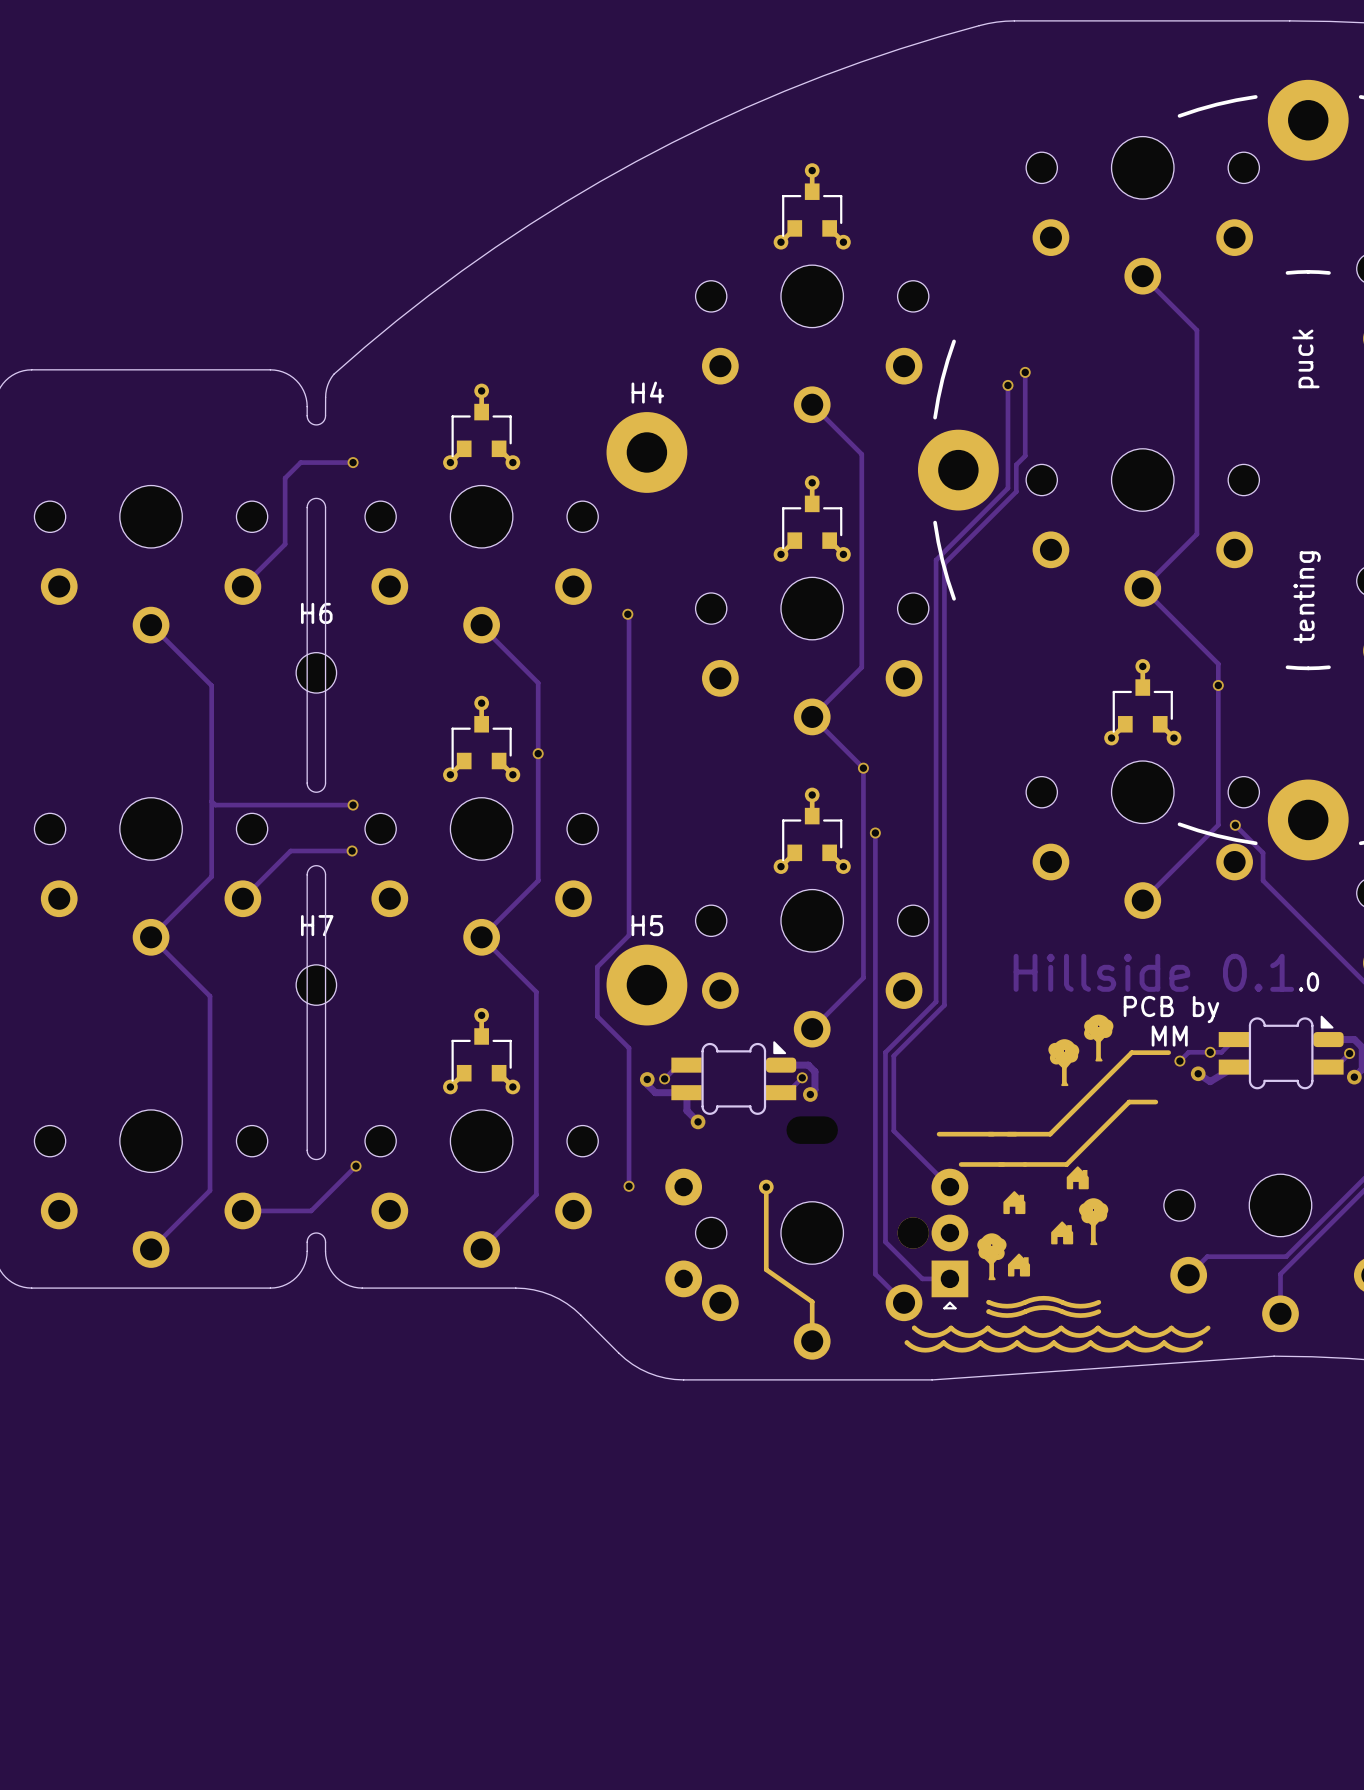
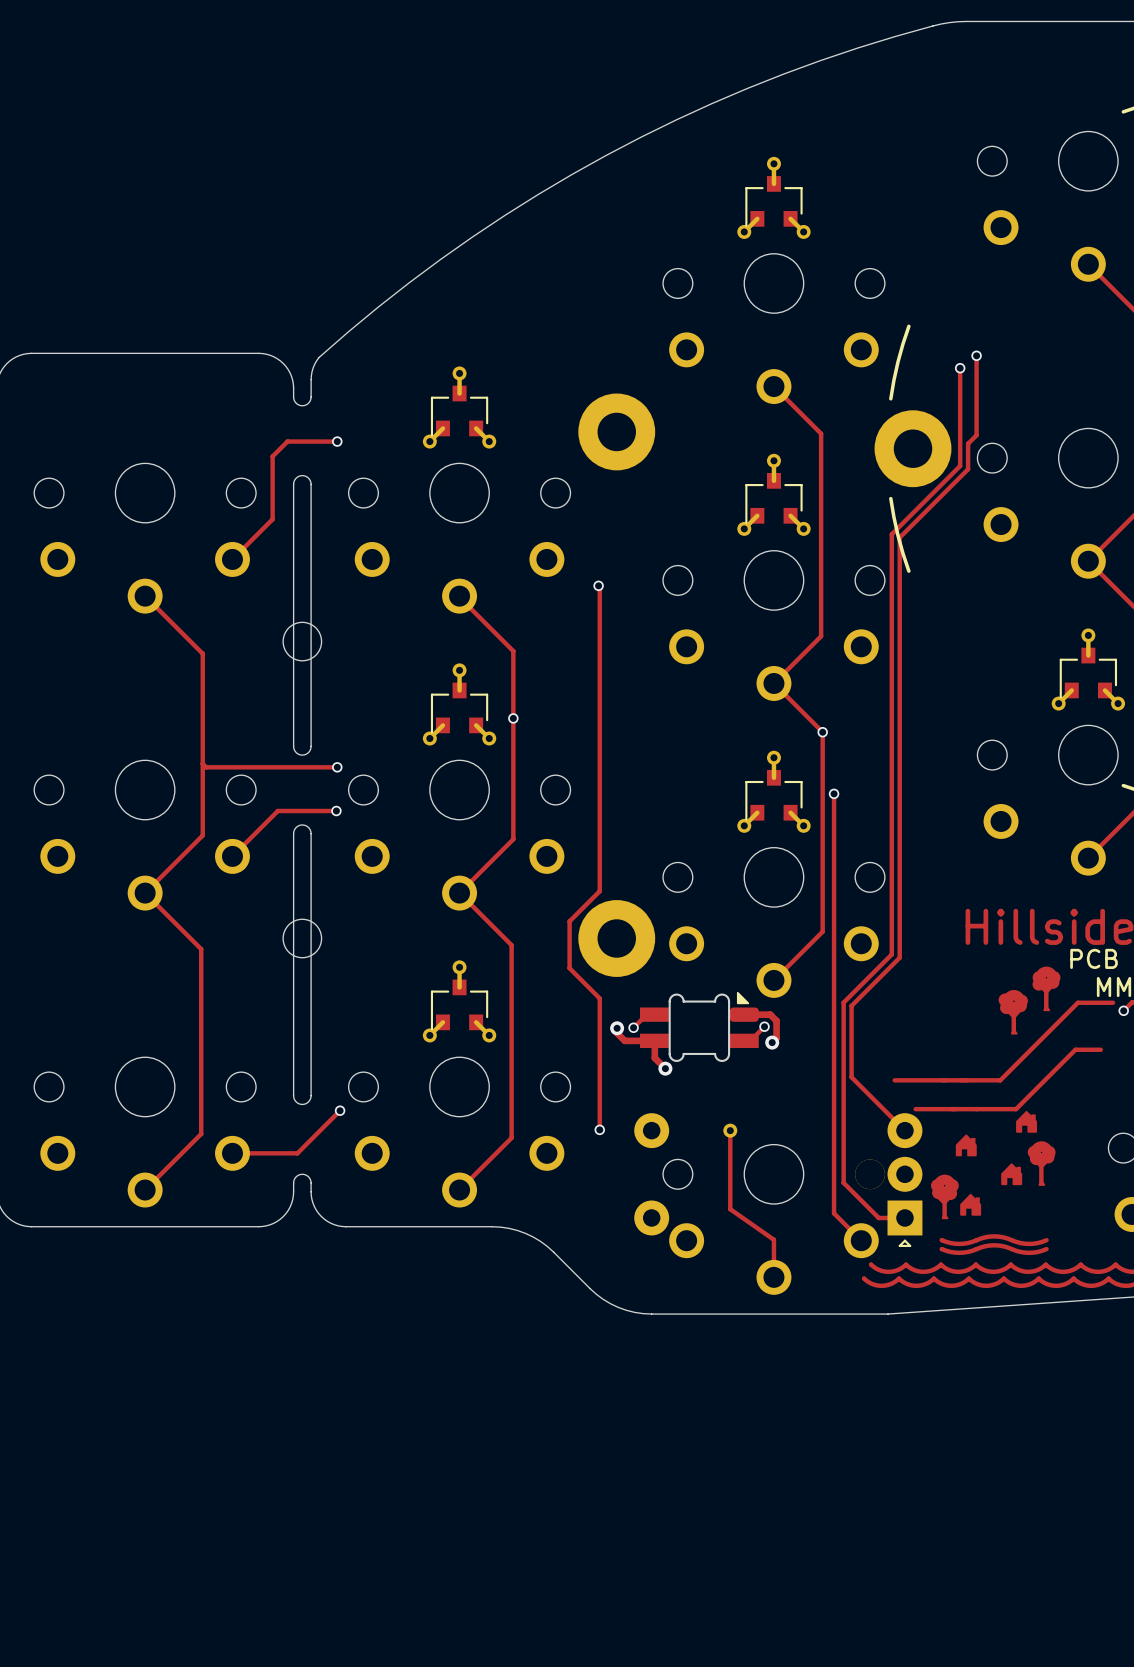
H4 name: H4 (647, 392) -> none
H6 name: H6 (316, 613) -> none
H7 name: H7 (317, 925) -> none
H5 name: H5 (647, 925) -> none

